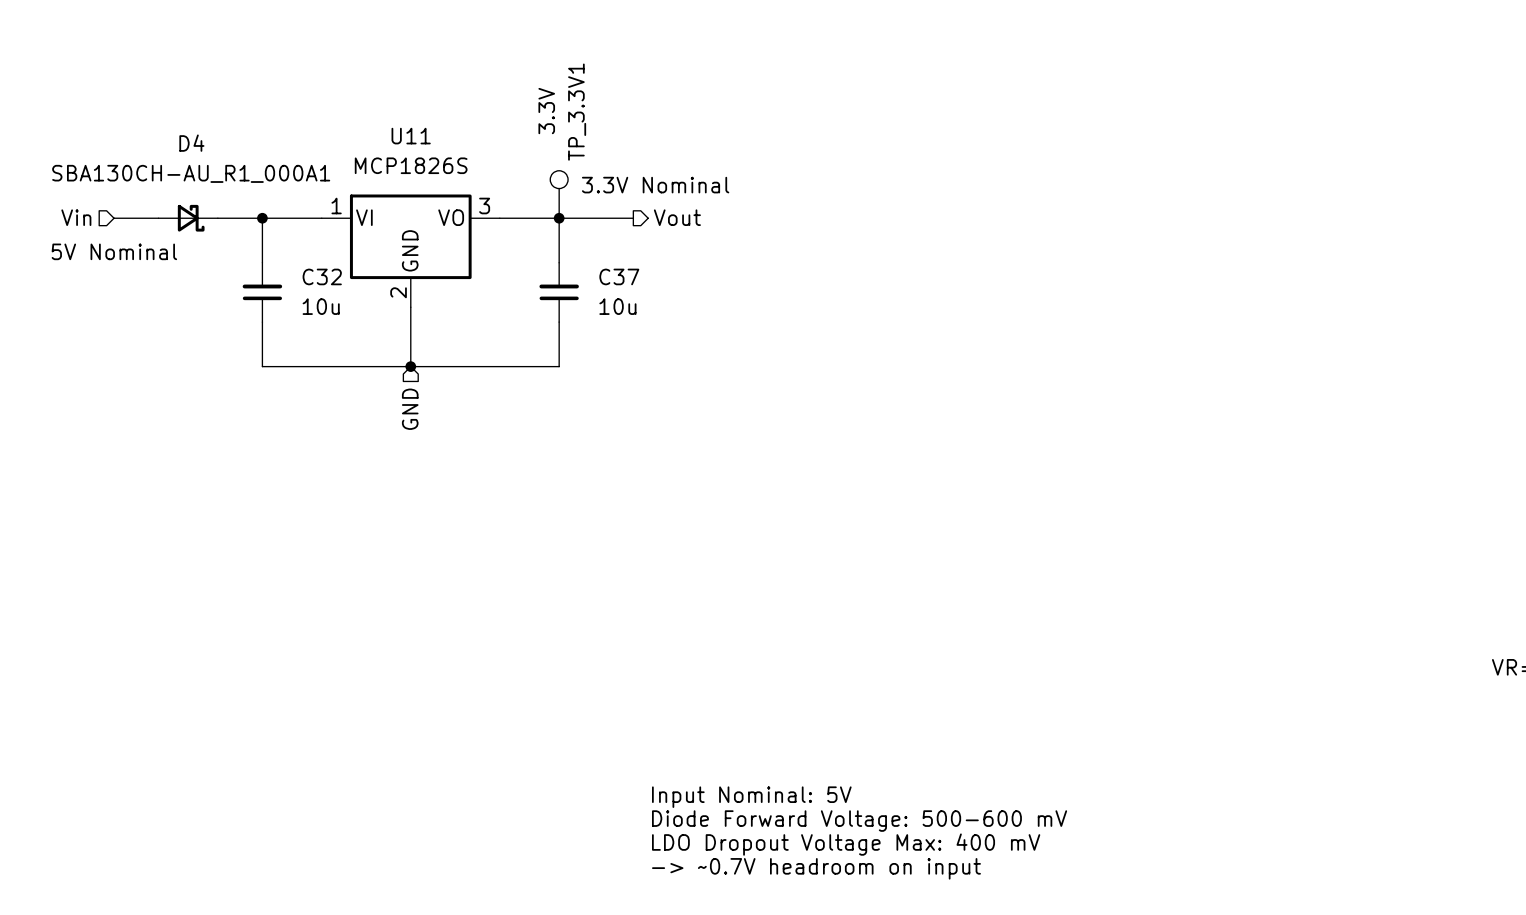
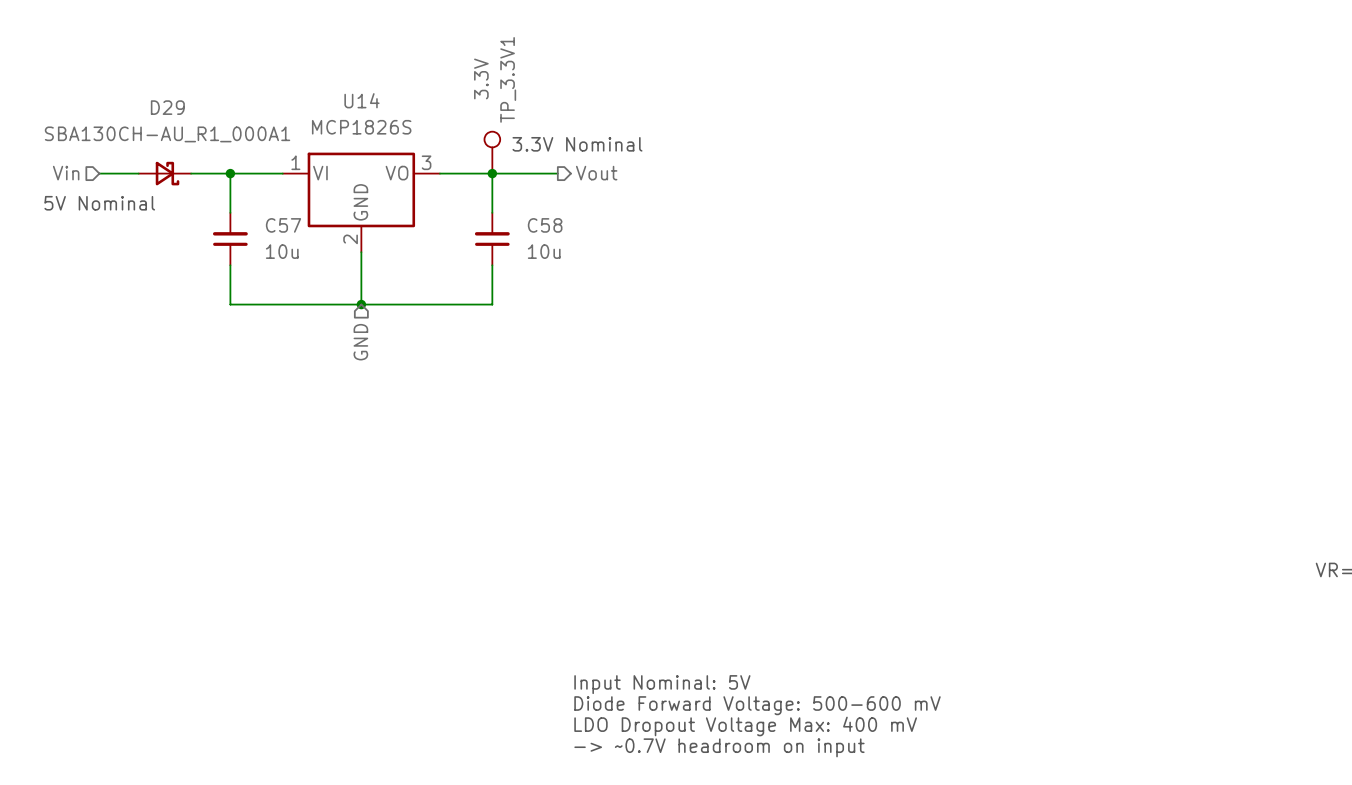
U11 name: U11 (411, 136) -> U14 (361, 100)
D4 name: D4 (191, 143) -> D29 (167, 107)
C32 name: C32 (322, 276) -> C57 (283, 225)
C37 name: C37 (619, 276) -> C58 (545, 225)

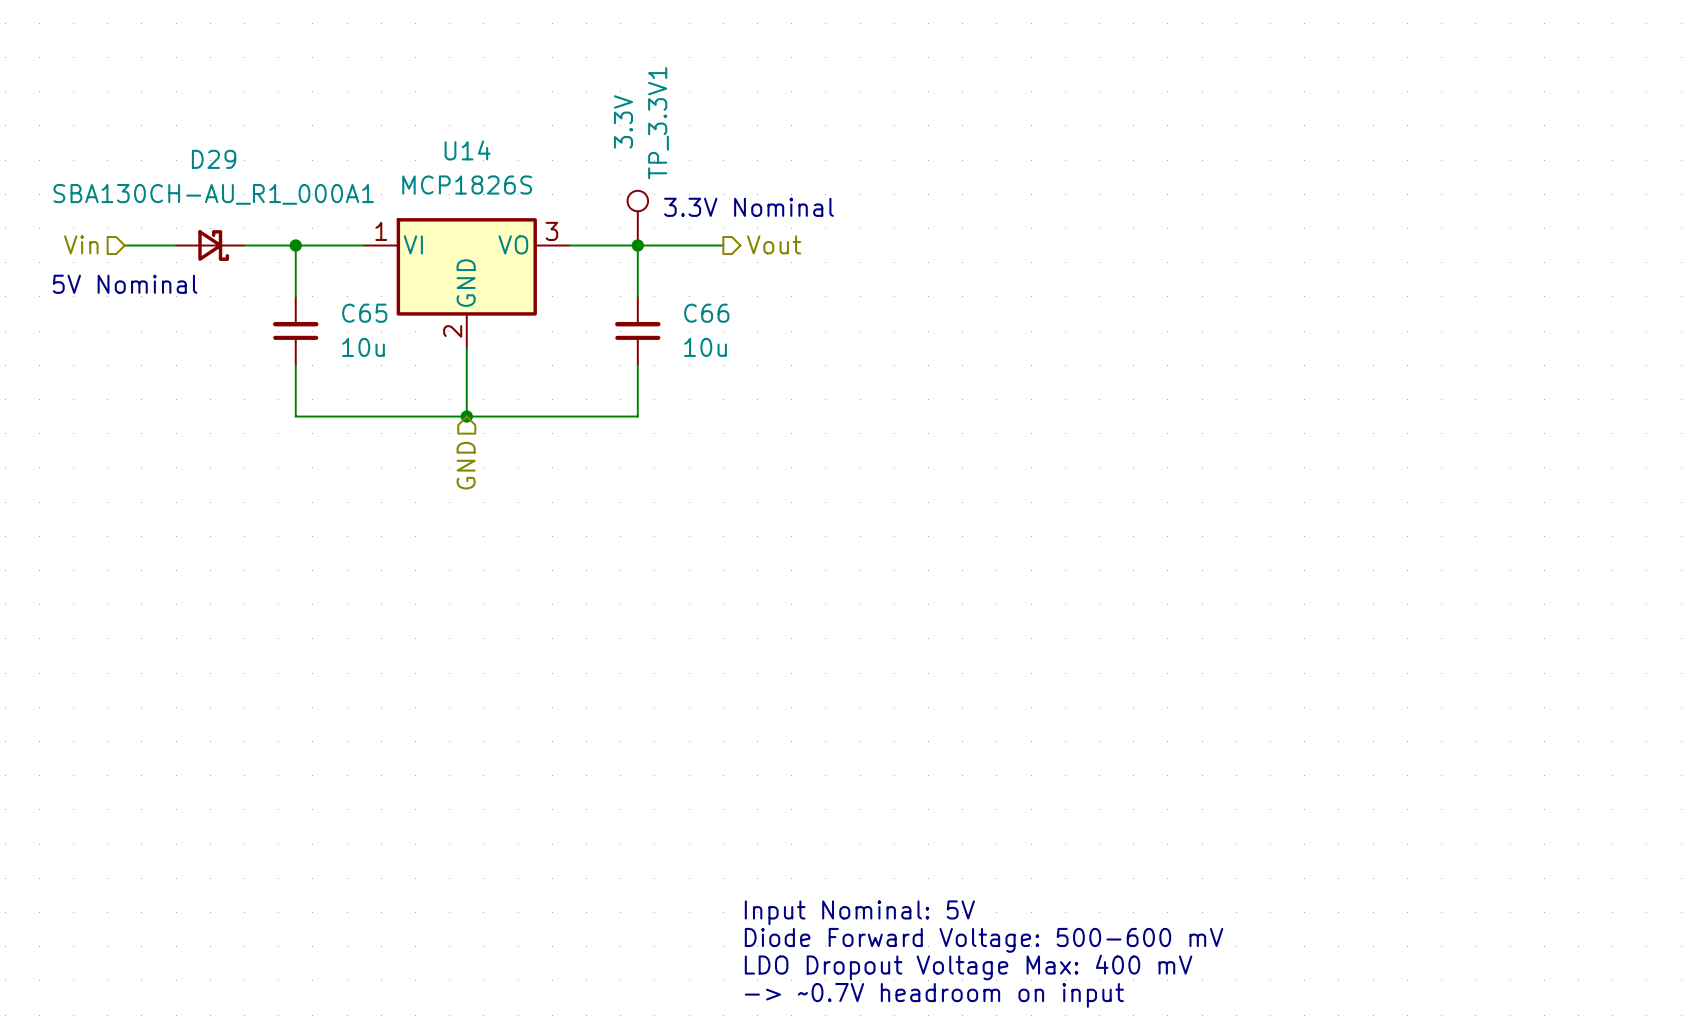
C57 name: C57 (283, 225) -> C65 (364, 313)
C58 name: C58 (545, 225) -> C66 (706, 313)

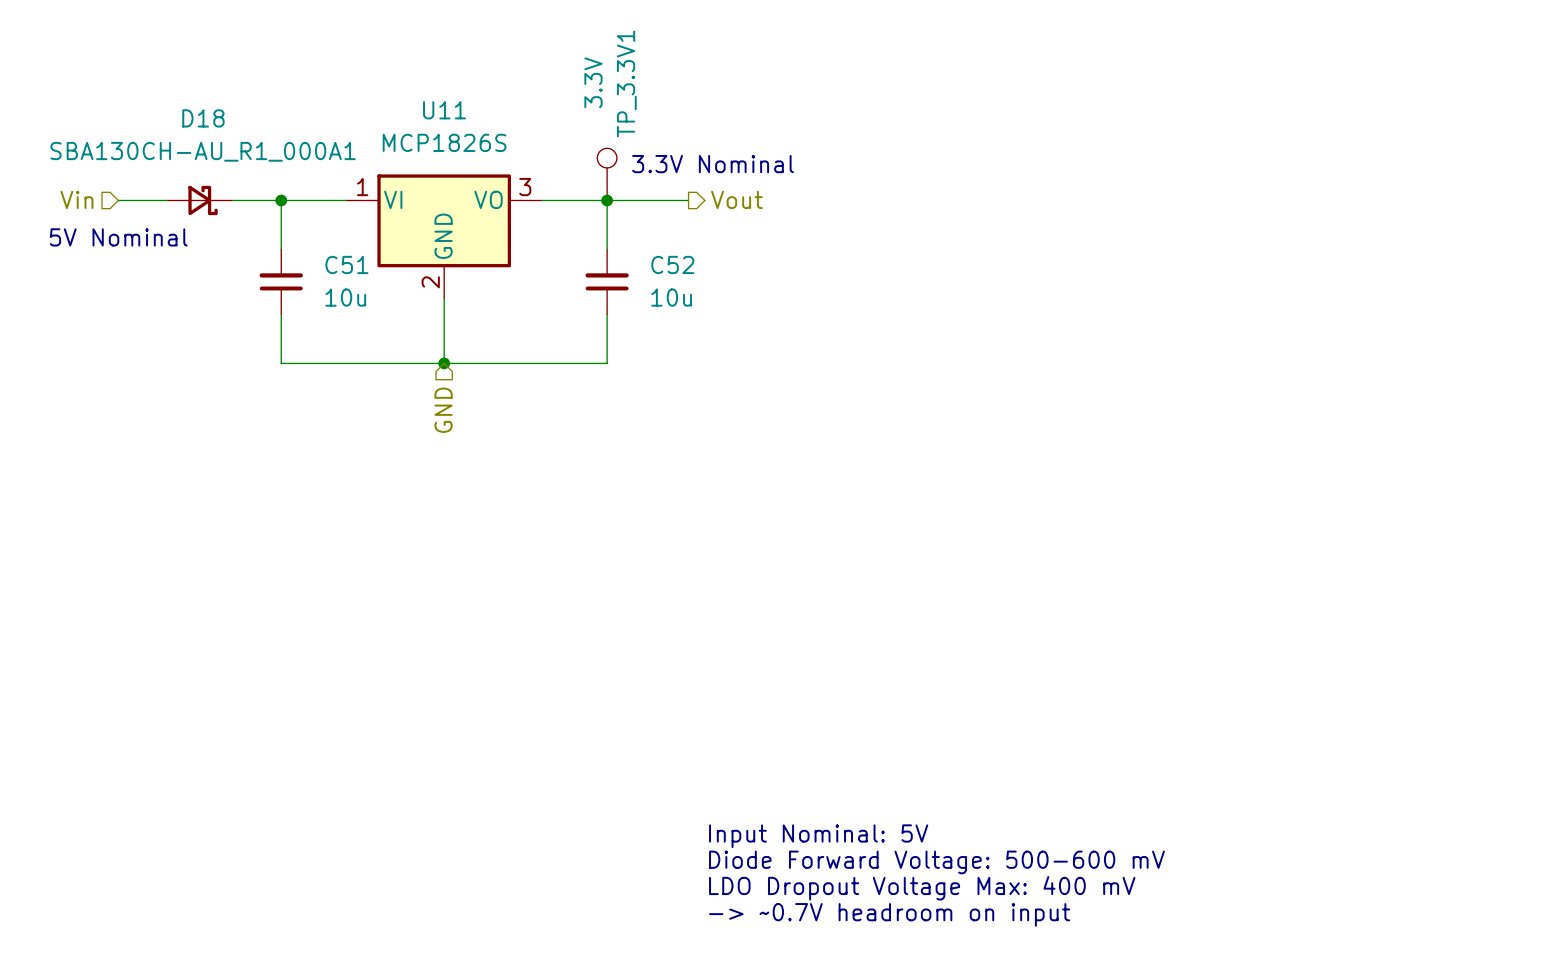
U14 name: U14 (467, 150) -> U11 (444, 110)
D29 name: D29 (214, 159) -> D18 (203, 118)
C65 name: C65 (364, 313) -> C51 (346, 264)
C66 name: C66 (706, 313) -> C52 (672, 264)

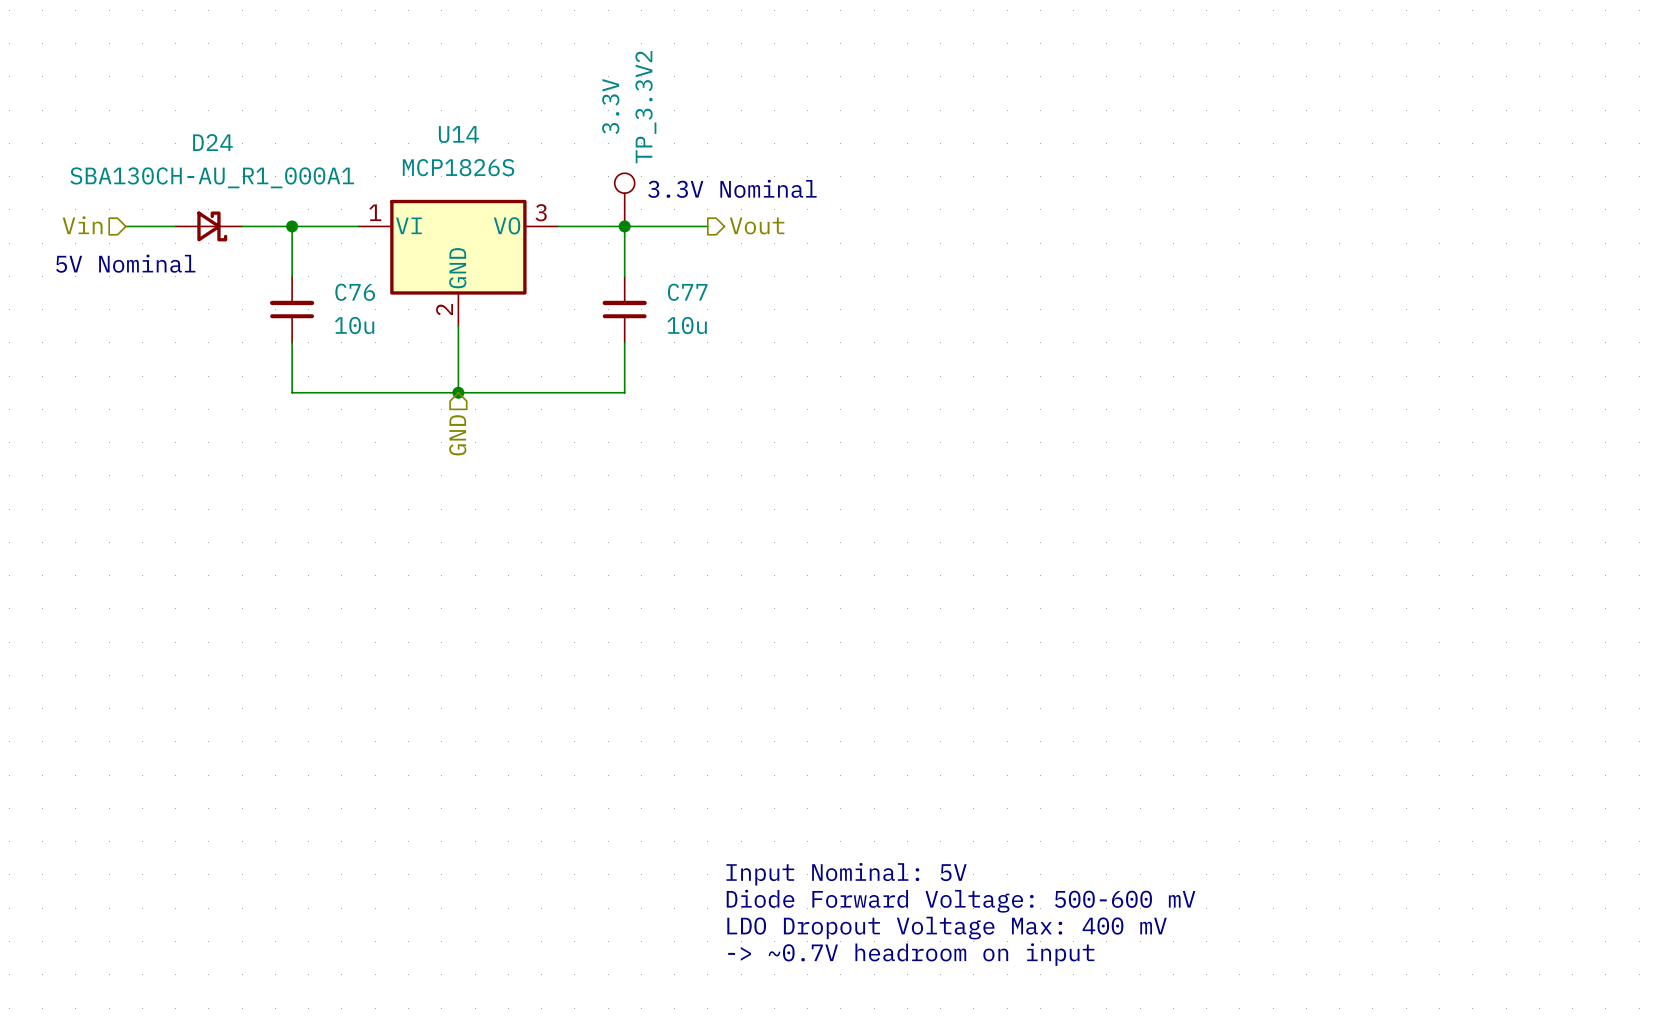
TP_3.3V1 name: TP_3.3V1 (626, 83) -> TP_3.3V2 (645, 107)
U11 name: U11 (444, 110) -> U14 (458, 134)
D18 name: D18 (203, 118) -> D24 (212, 142)
C51 name: C51 (346, 264) -> C76 (355, 292)
C52 name: C52 (672, 264) -> C77 (687, 292)

